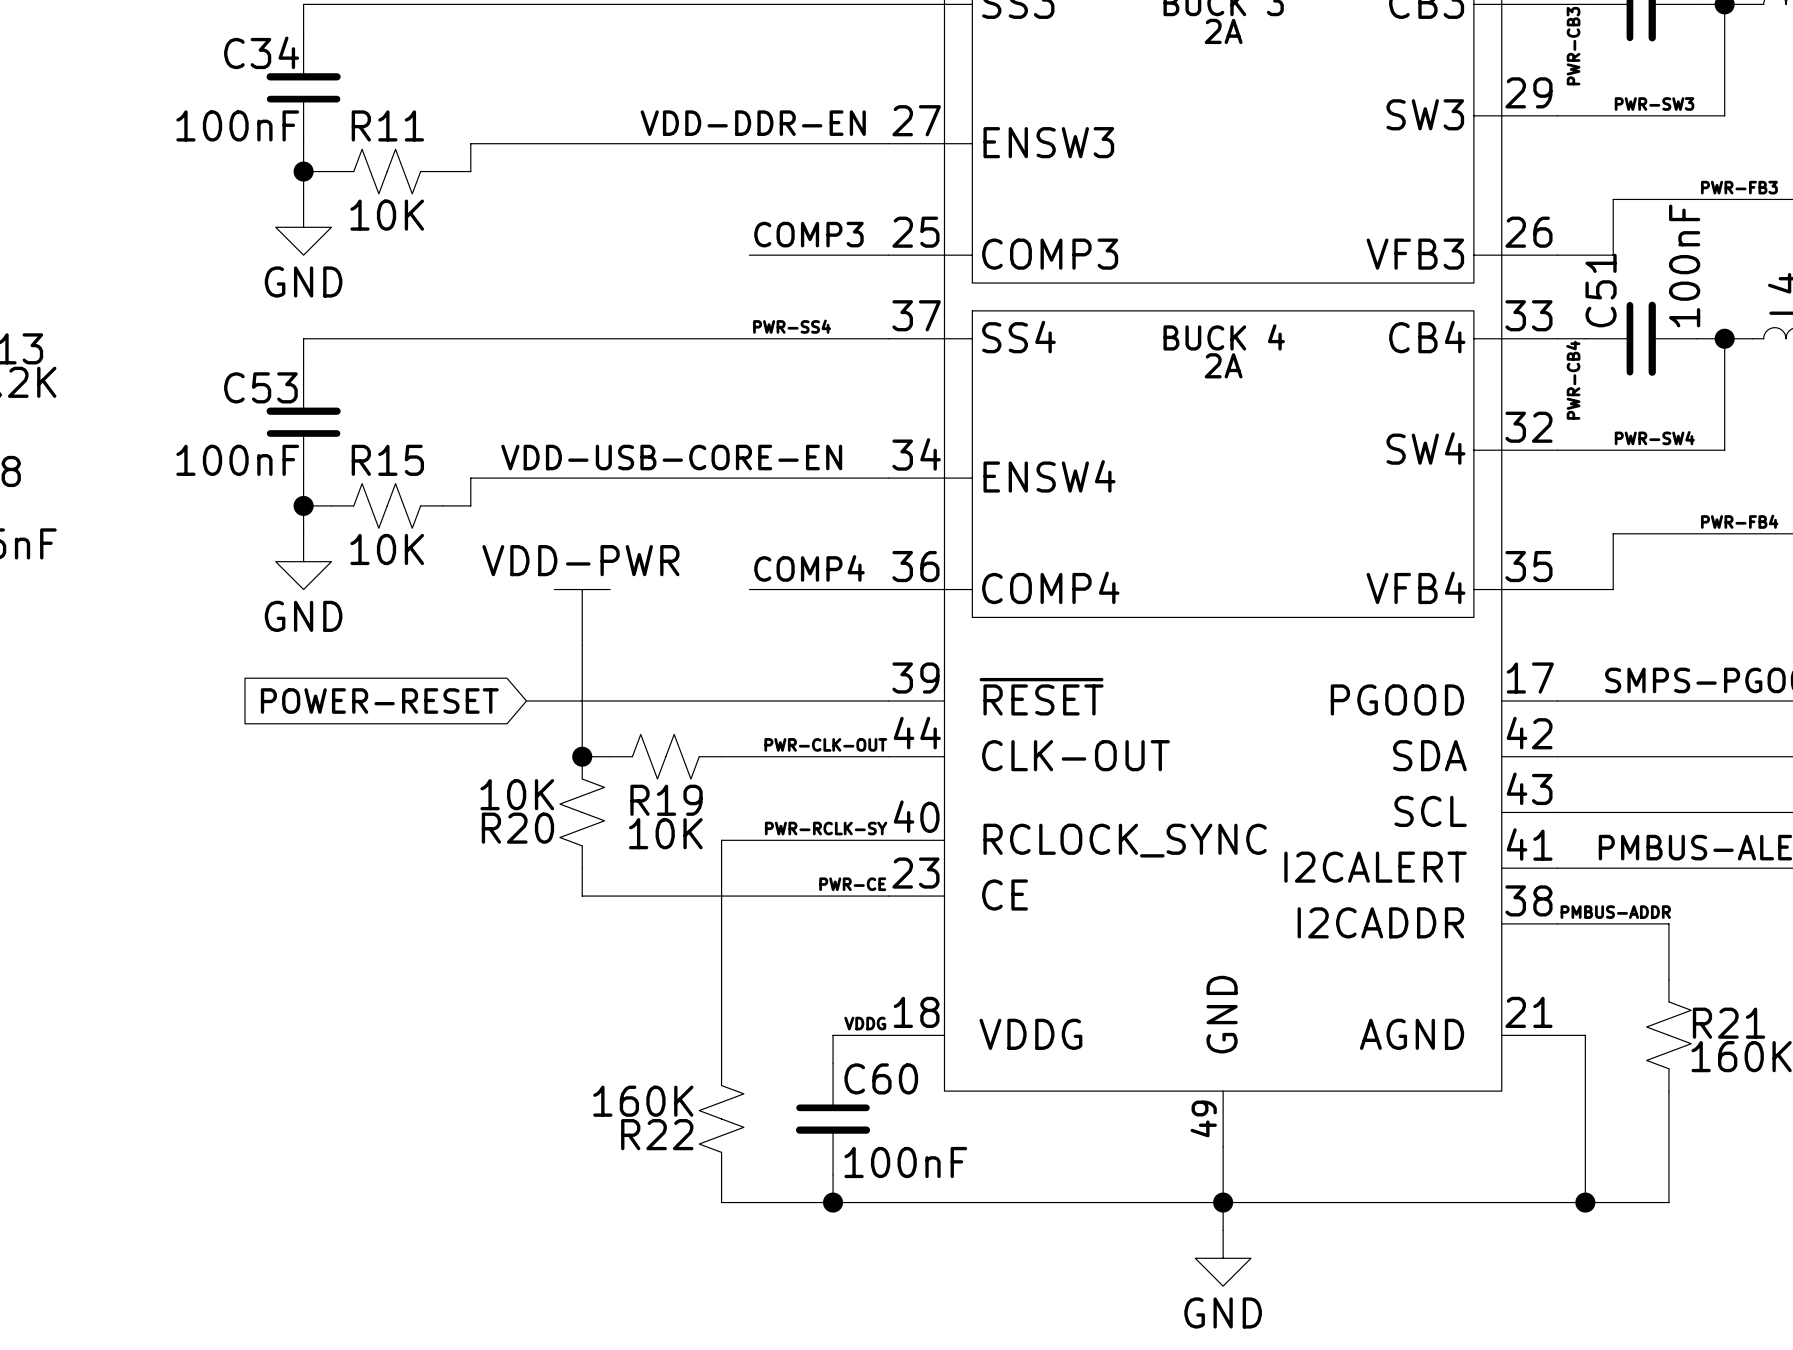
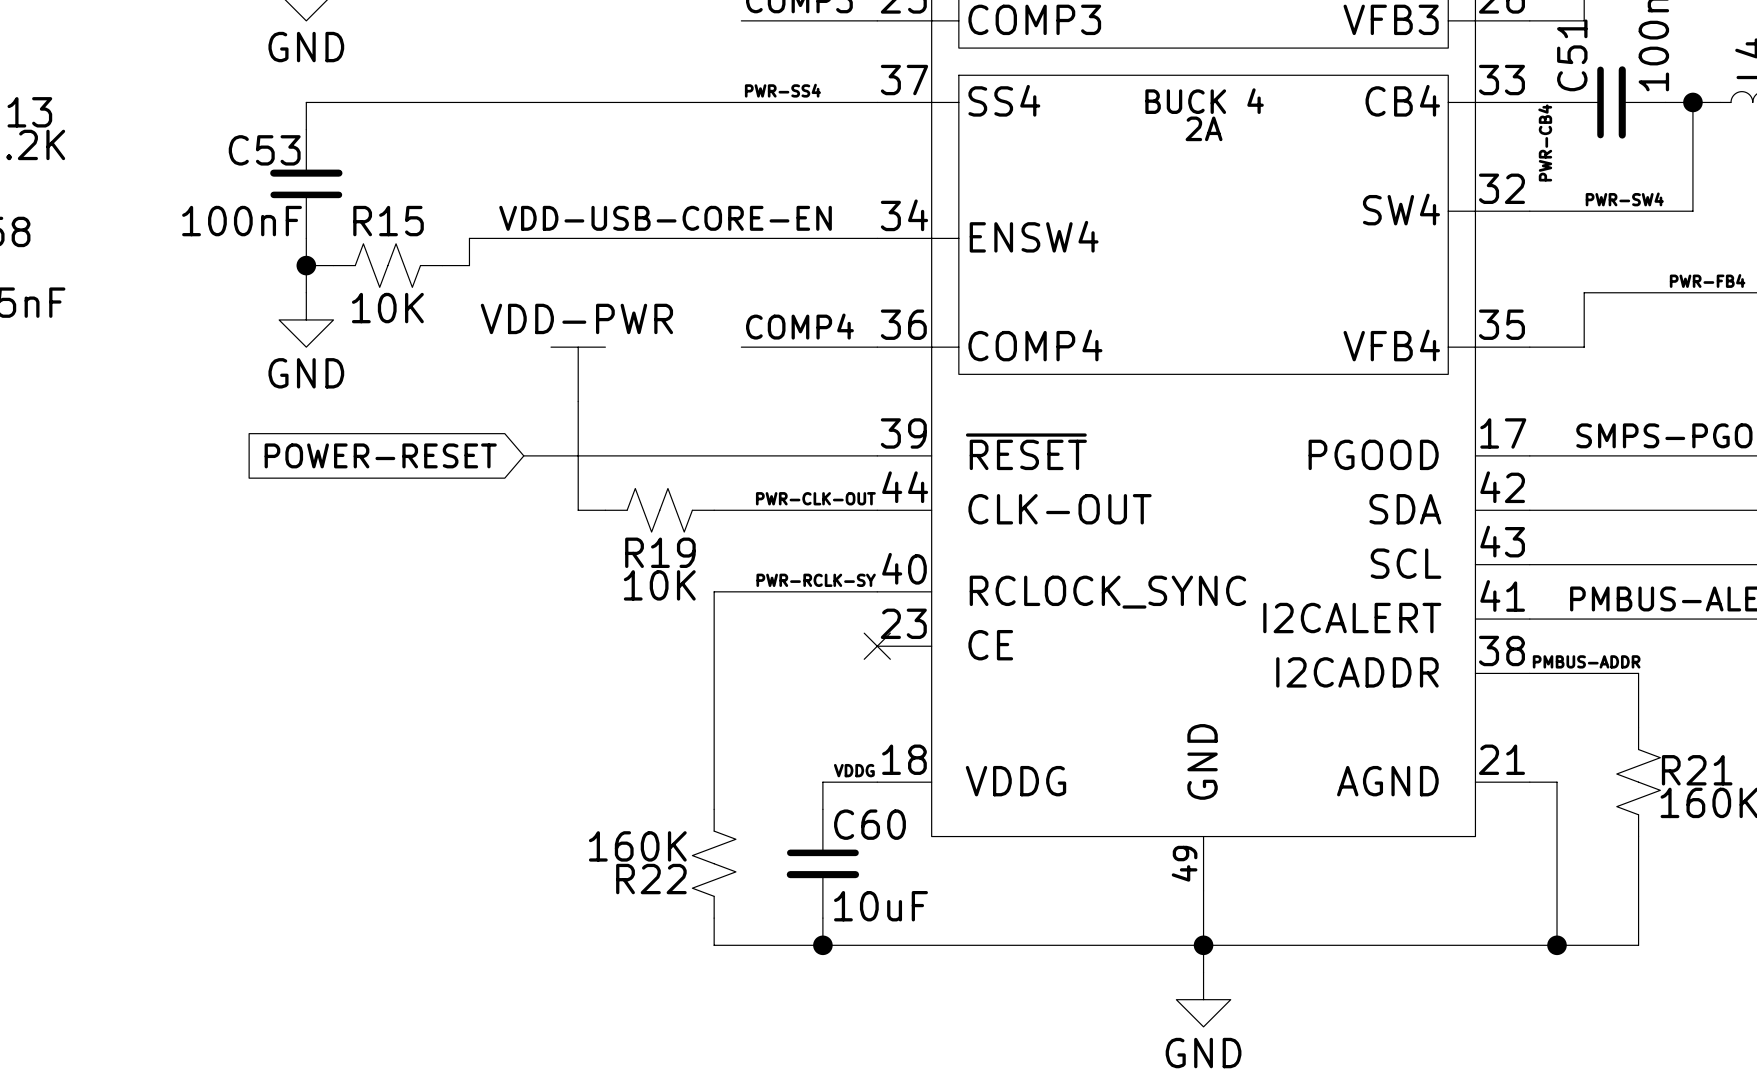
junction: (582, 756) -> none
R20: 10K (582, 812) -> none
wire: (582, 868) (582, 896) (888, 896) -> none
label: PWR-CE (852, 884) -> none
no-connect mark: none -> (877, 646)
C60 value: 100nF (905, 1162) -> 10uF (880, 906)

